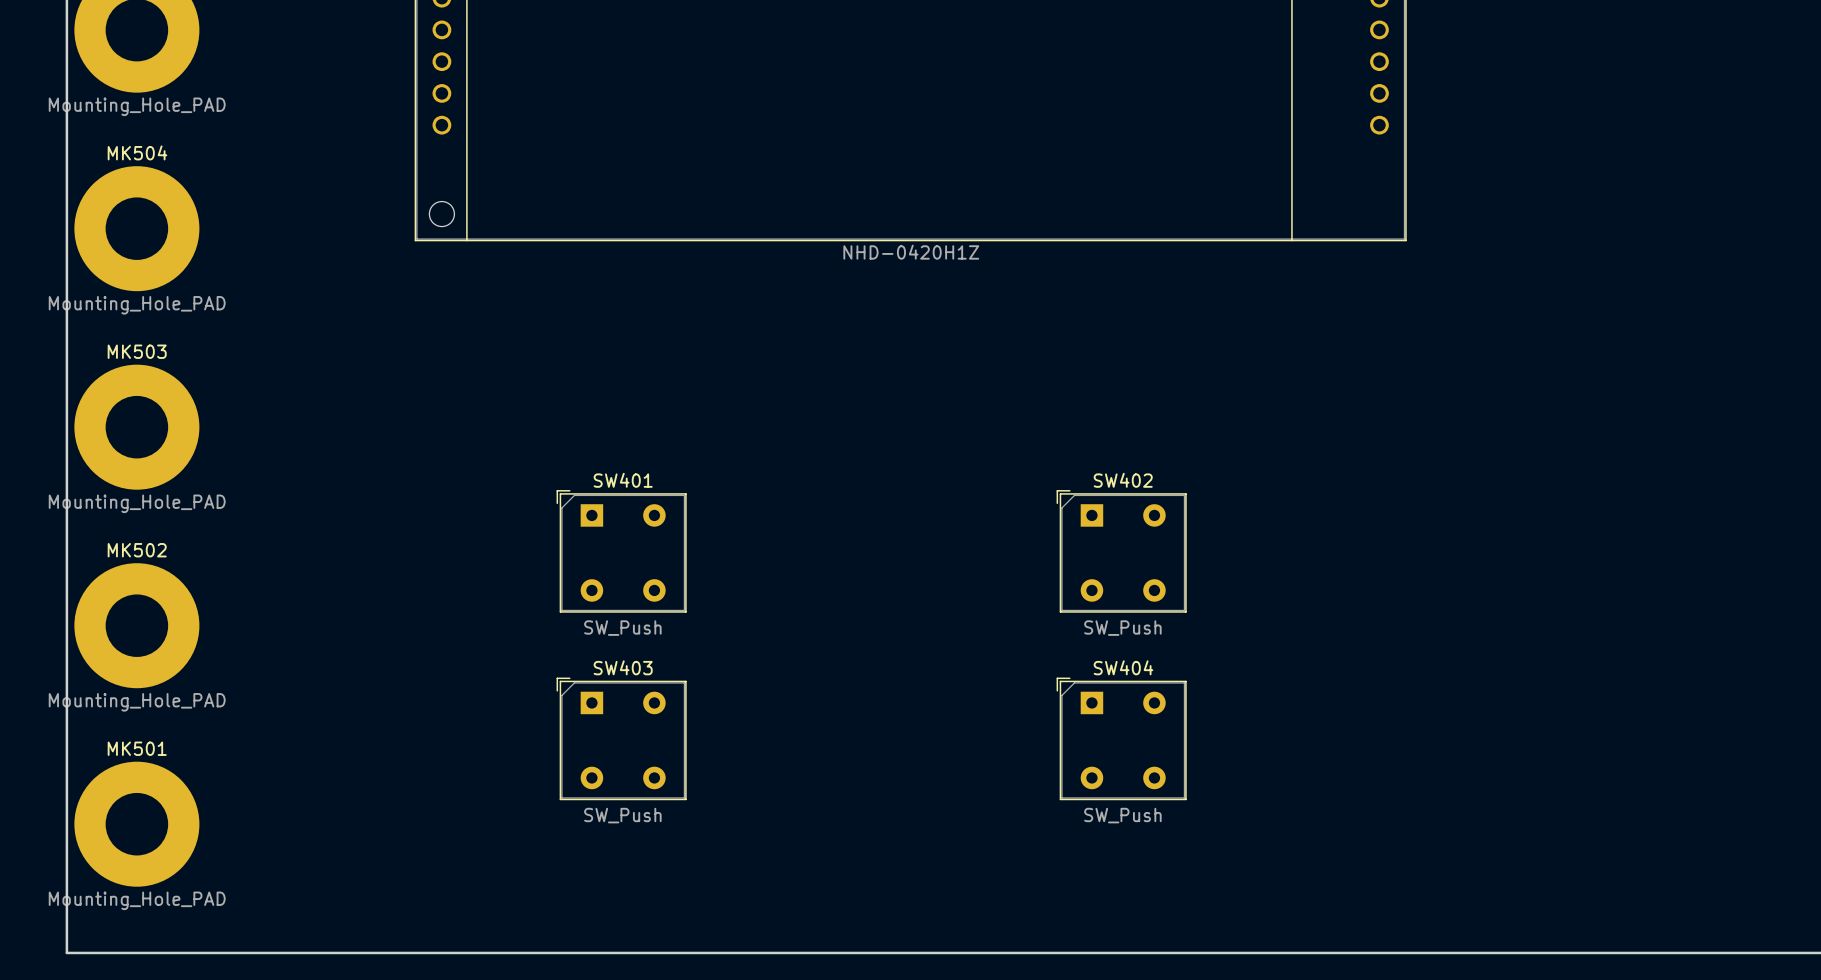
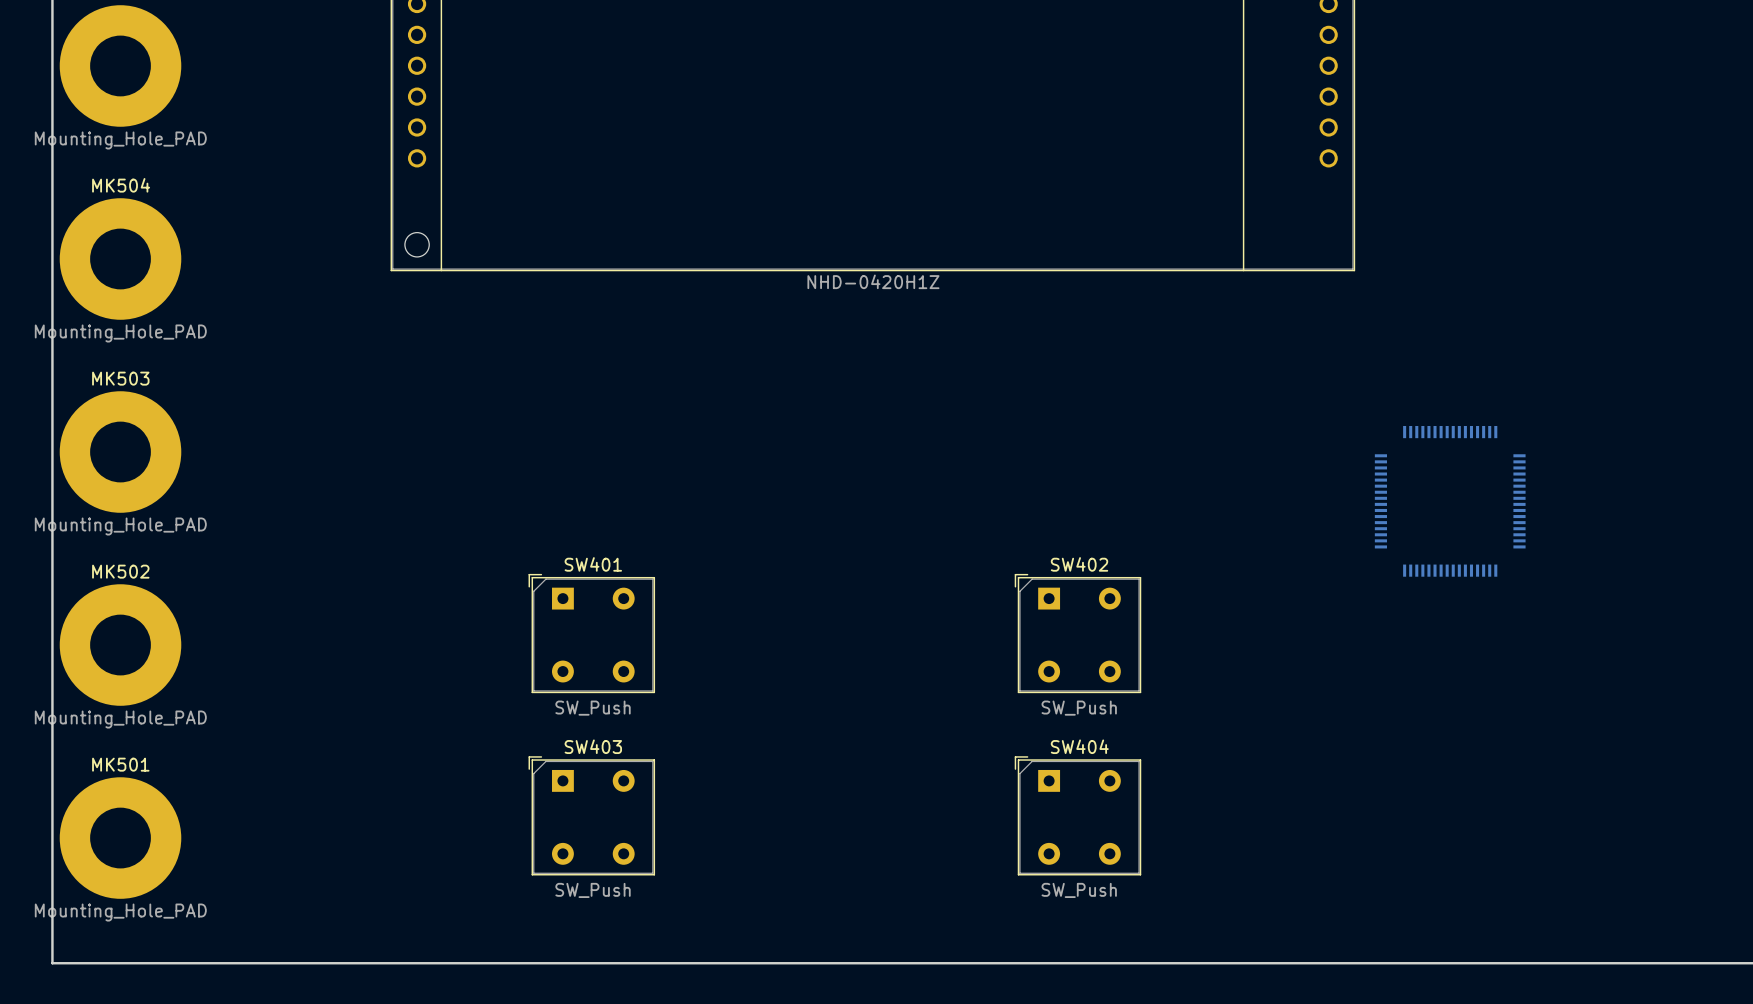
part: none -> (1450, 501)
SW401 position: (621, 551) -> (591, 633)
SW402 position: (1121, 551) -> (1077, 633)
SW403 position: (621, 738) -> (591, 815)
SW404 position: (1121, 738) -> (1077, 815)

